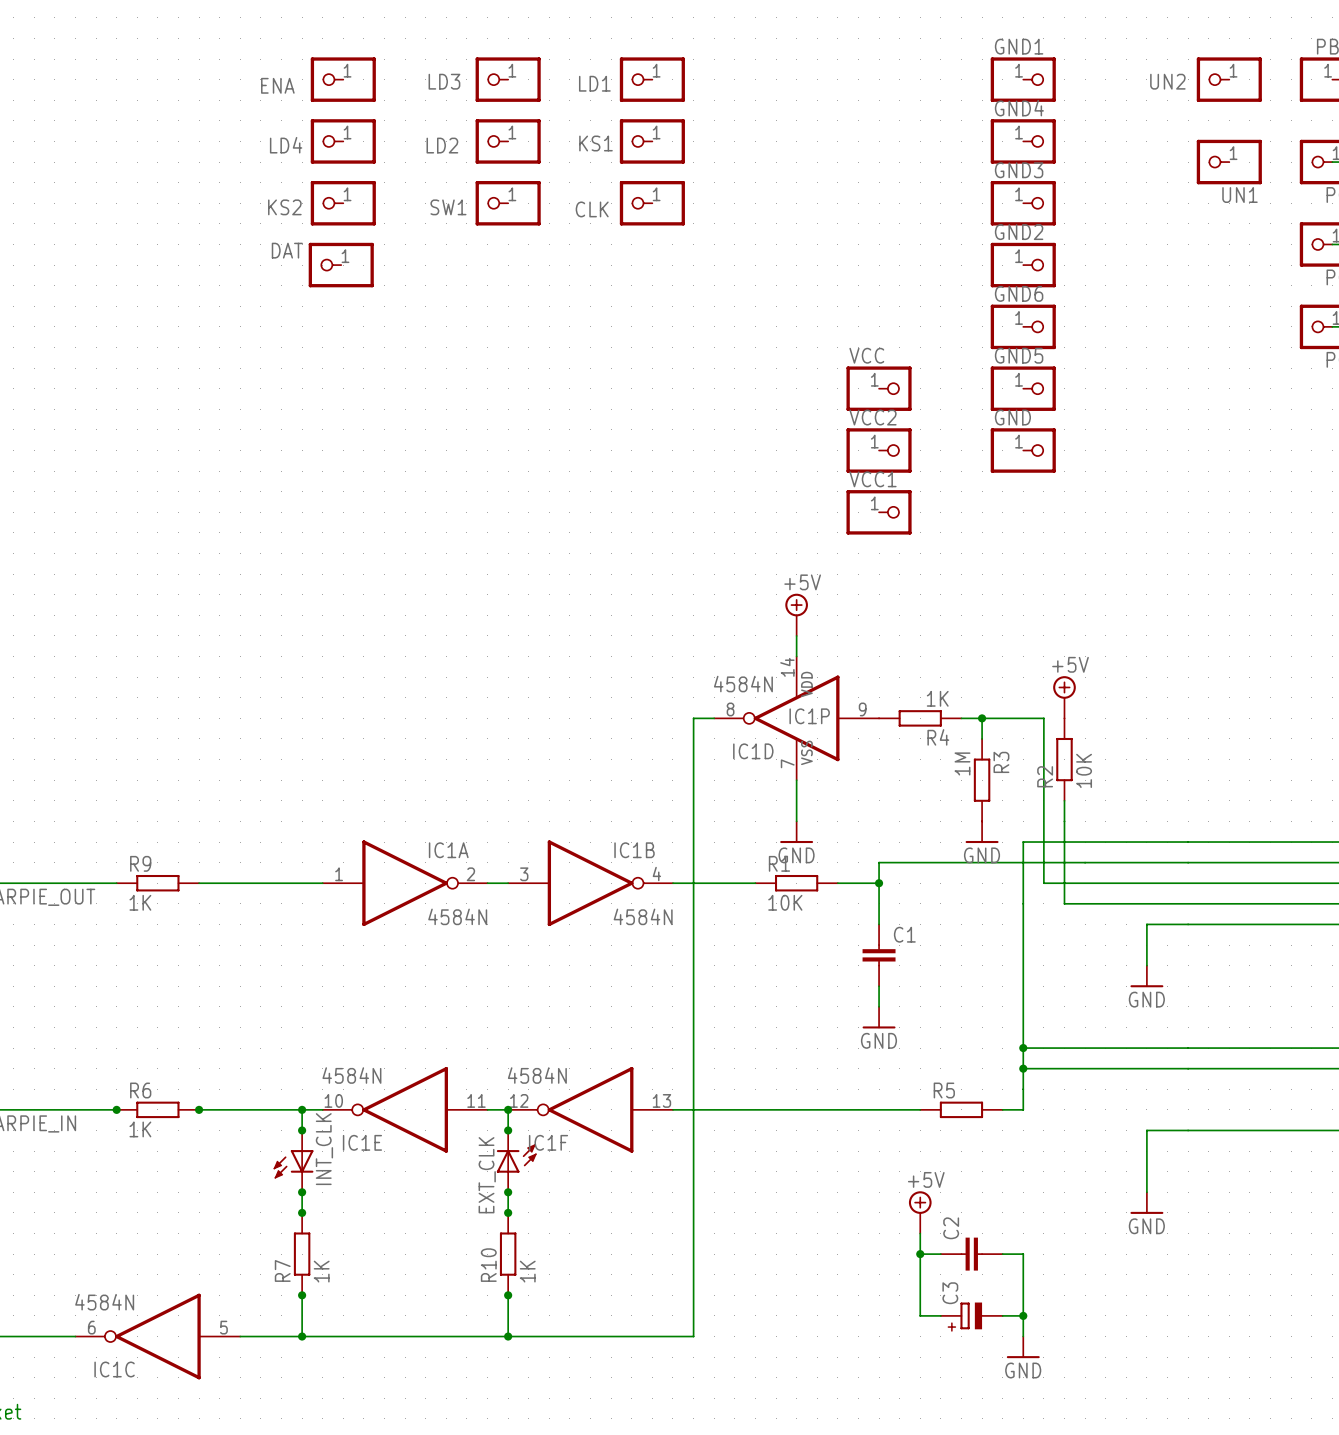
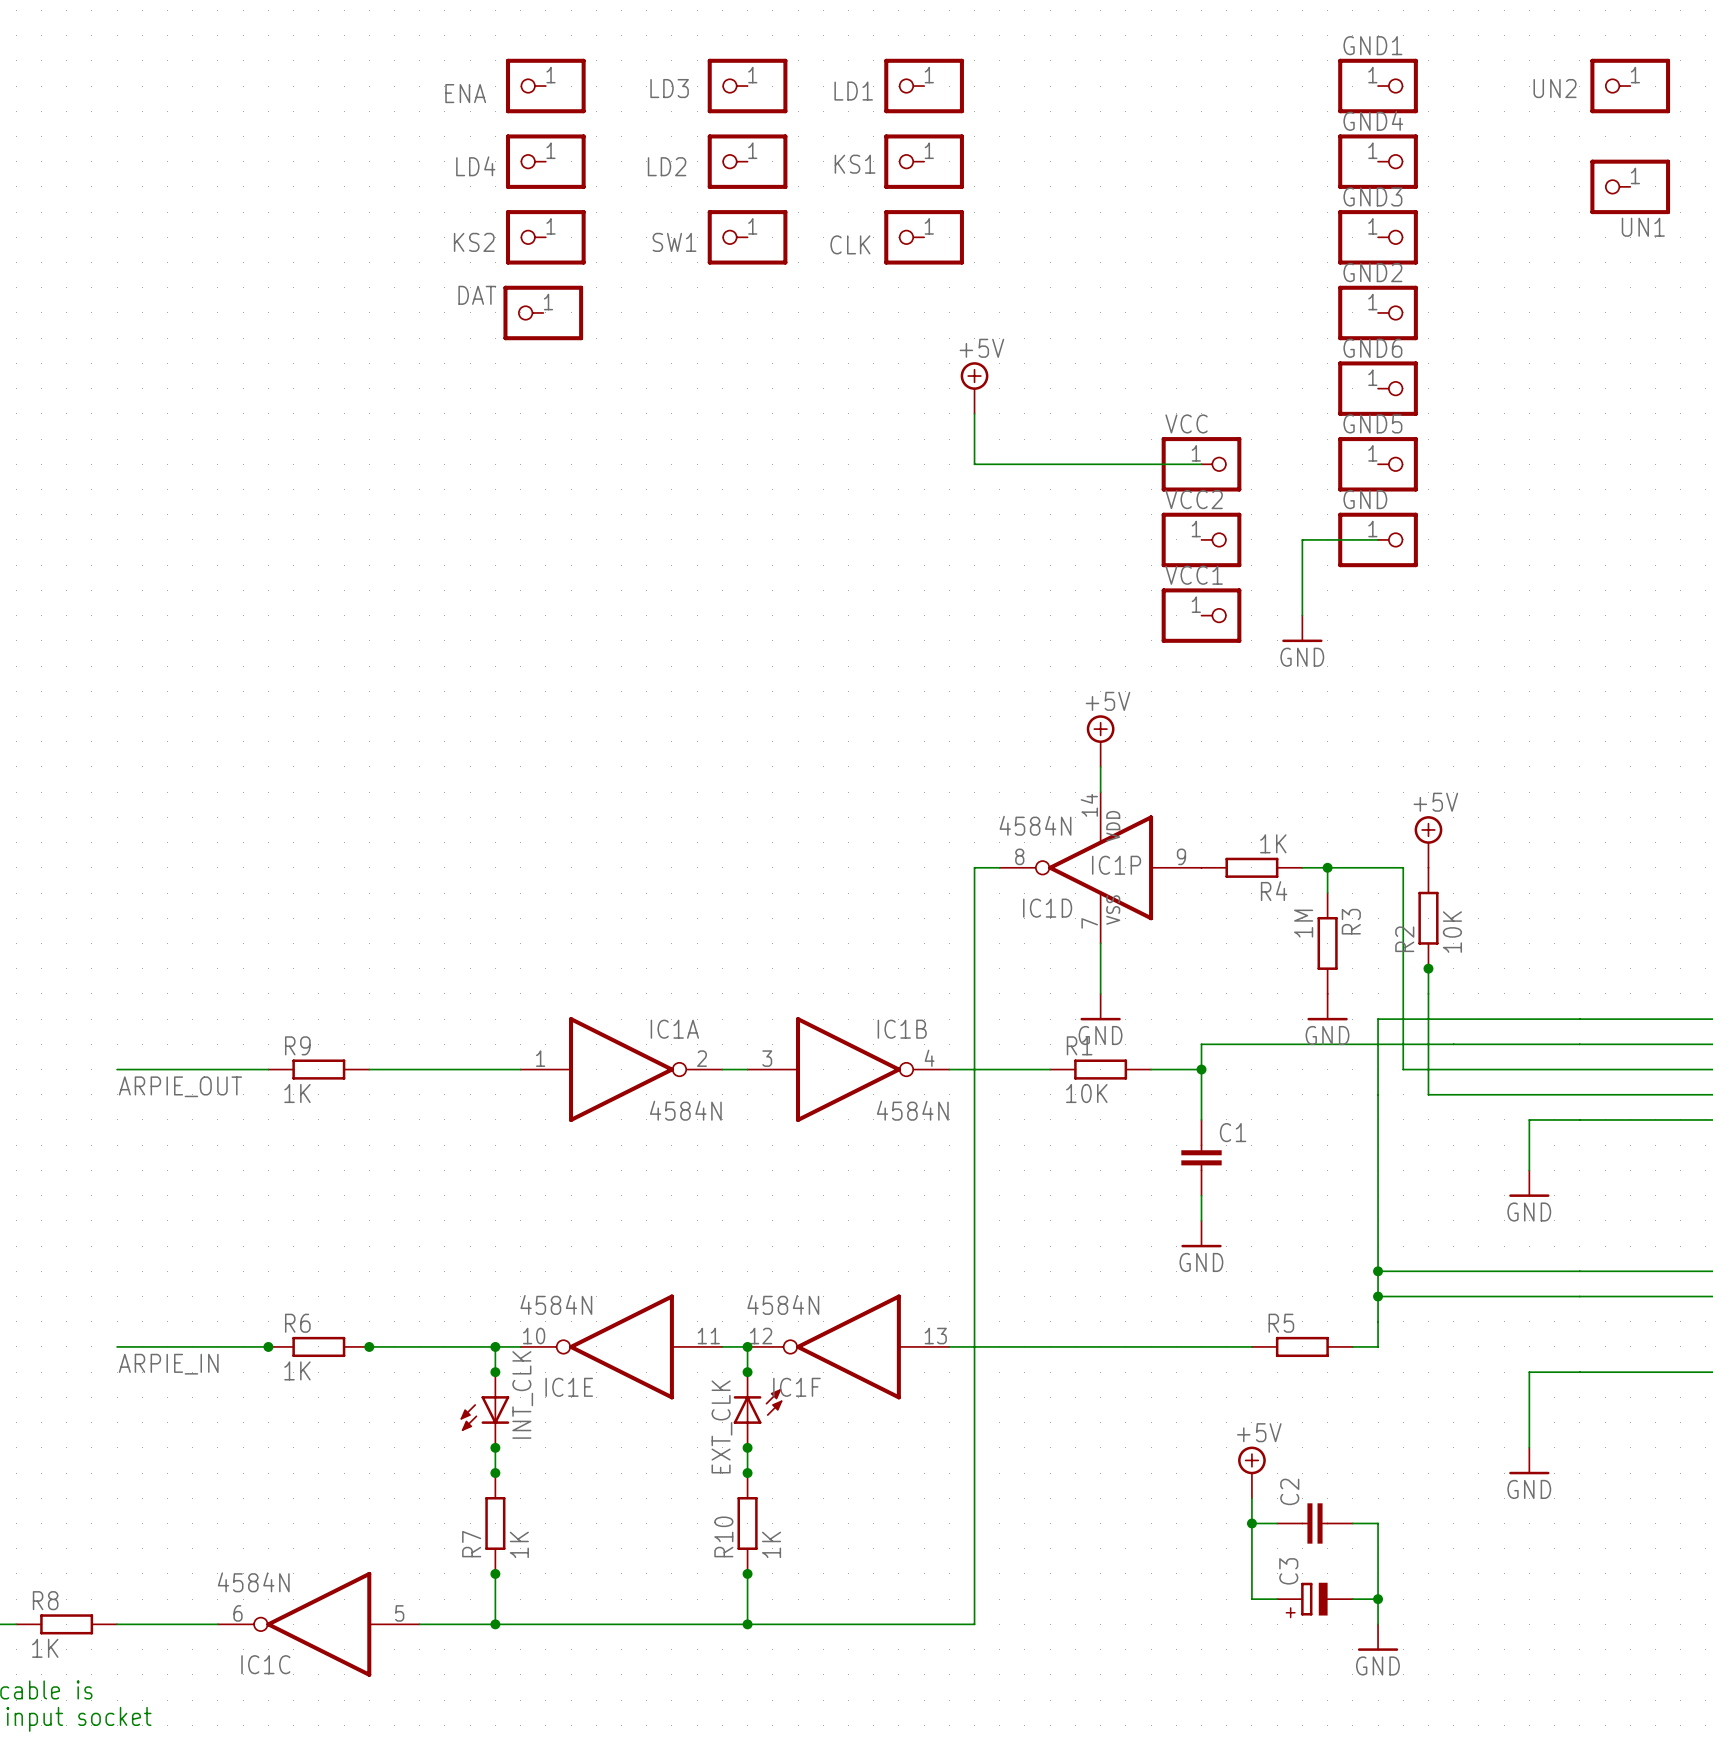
power symbol: none -> +5V (974, 388)
wire: none -> (974, 413) (974, 464) (1201, 464)
wire: none -> (1378, 539) (1302, 539) (1302, 615)
power symbol: none -> GND (1302, 628)
junction: none -> (1428, 968)

